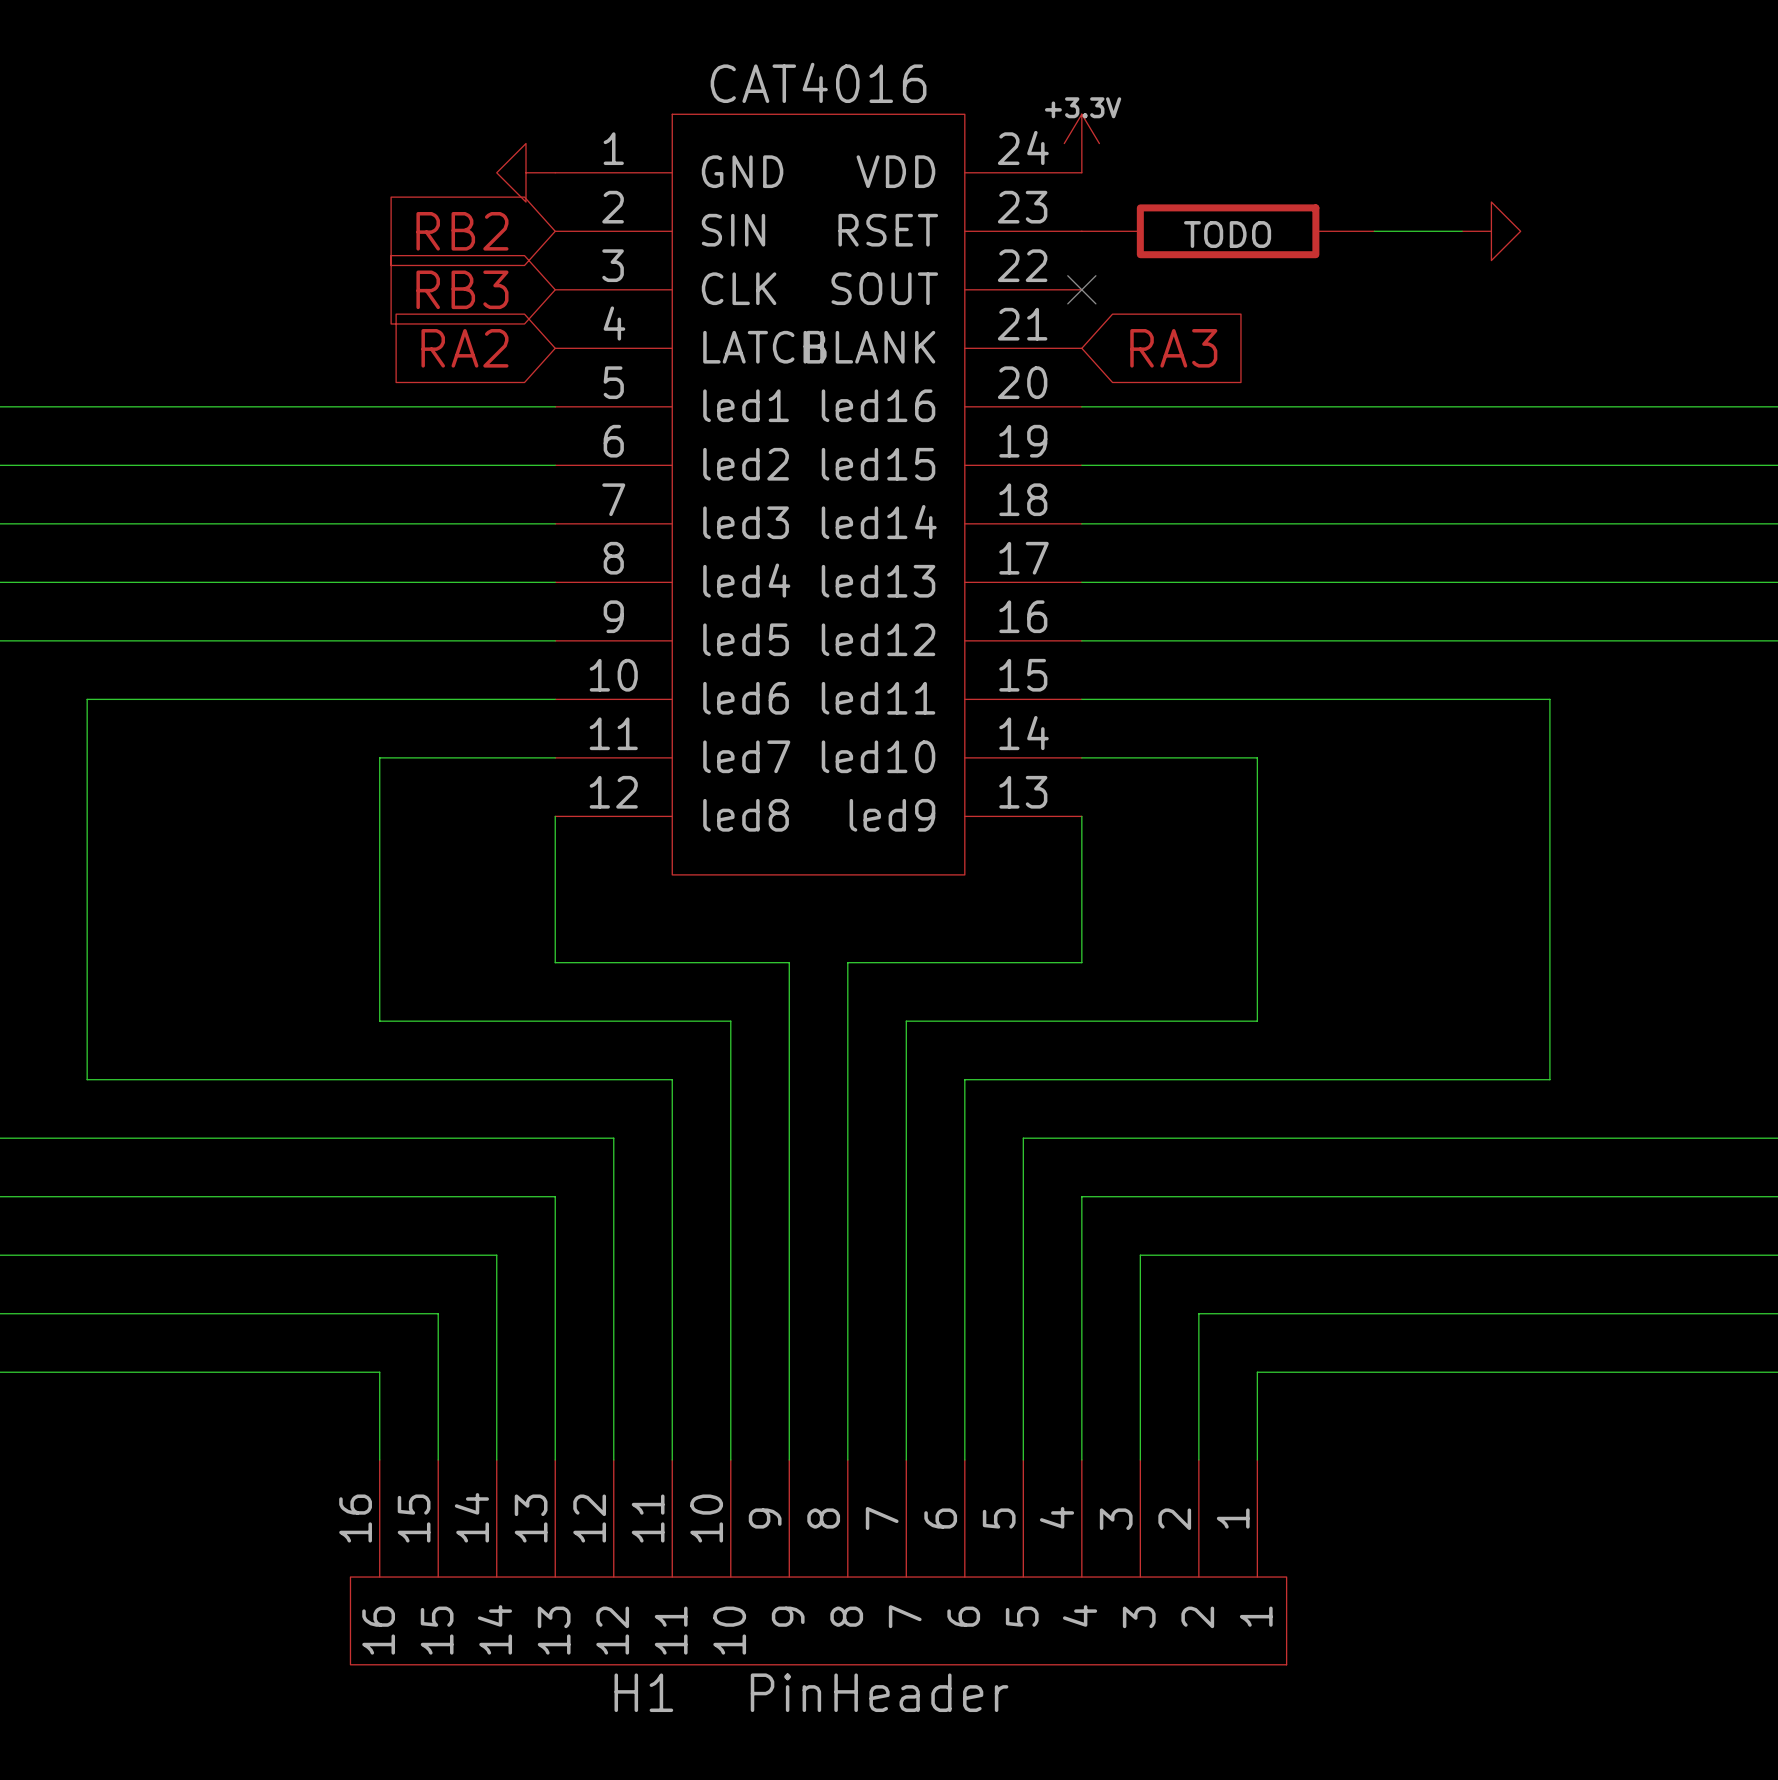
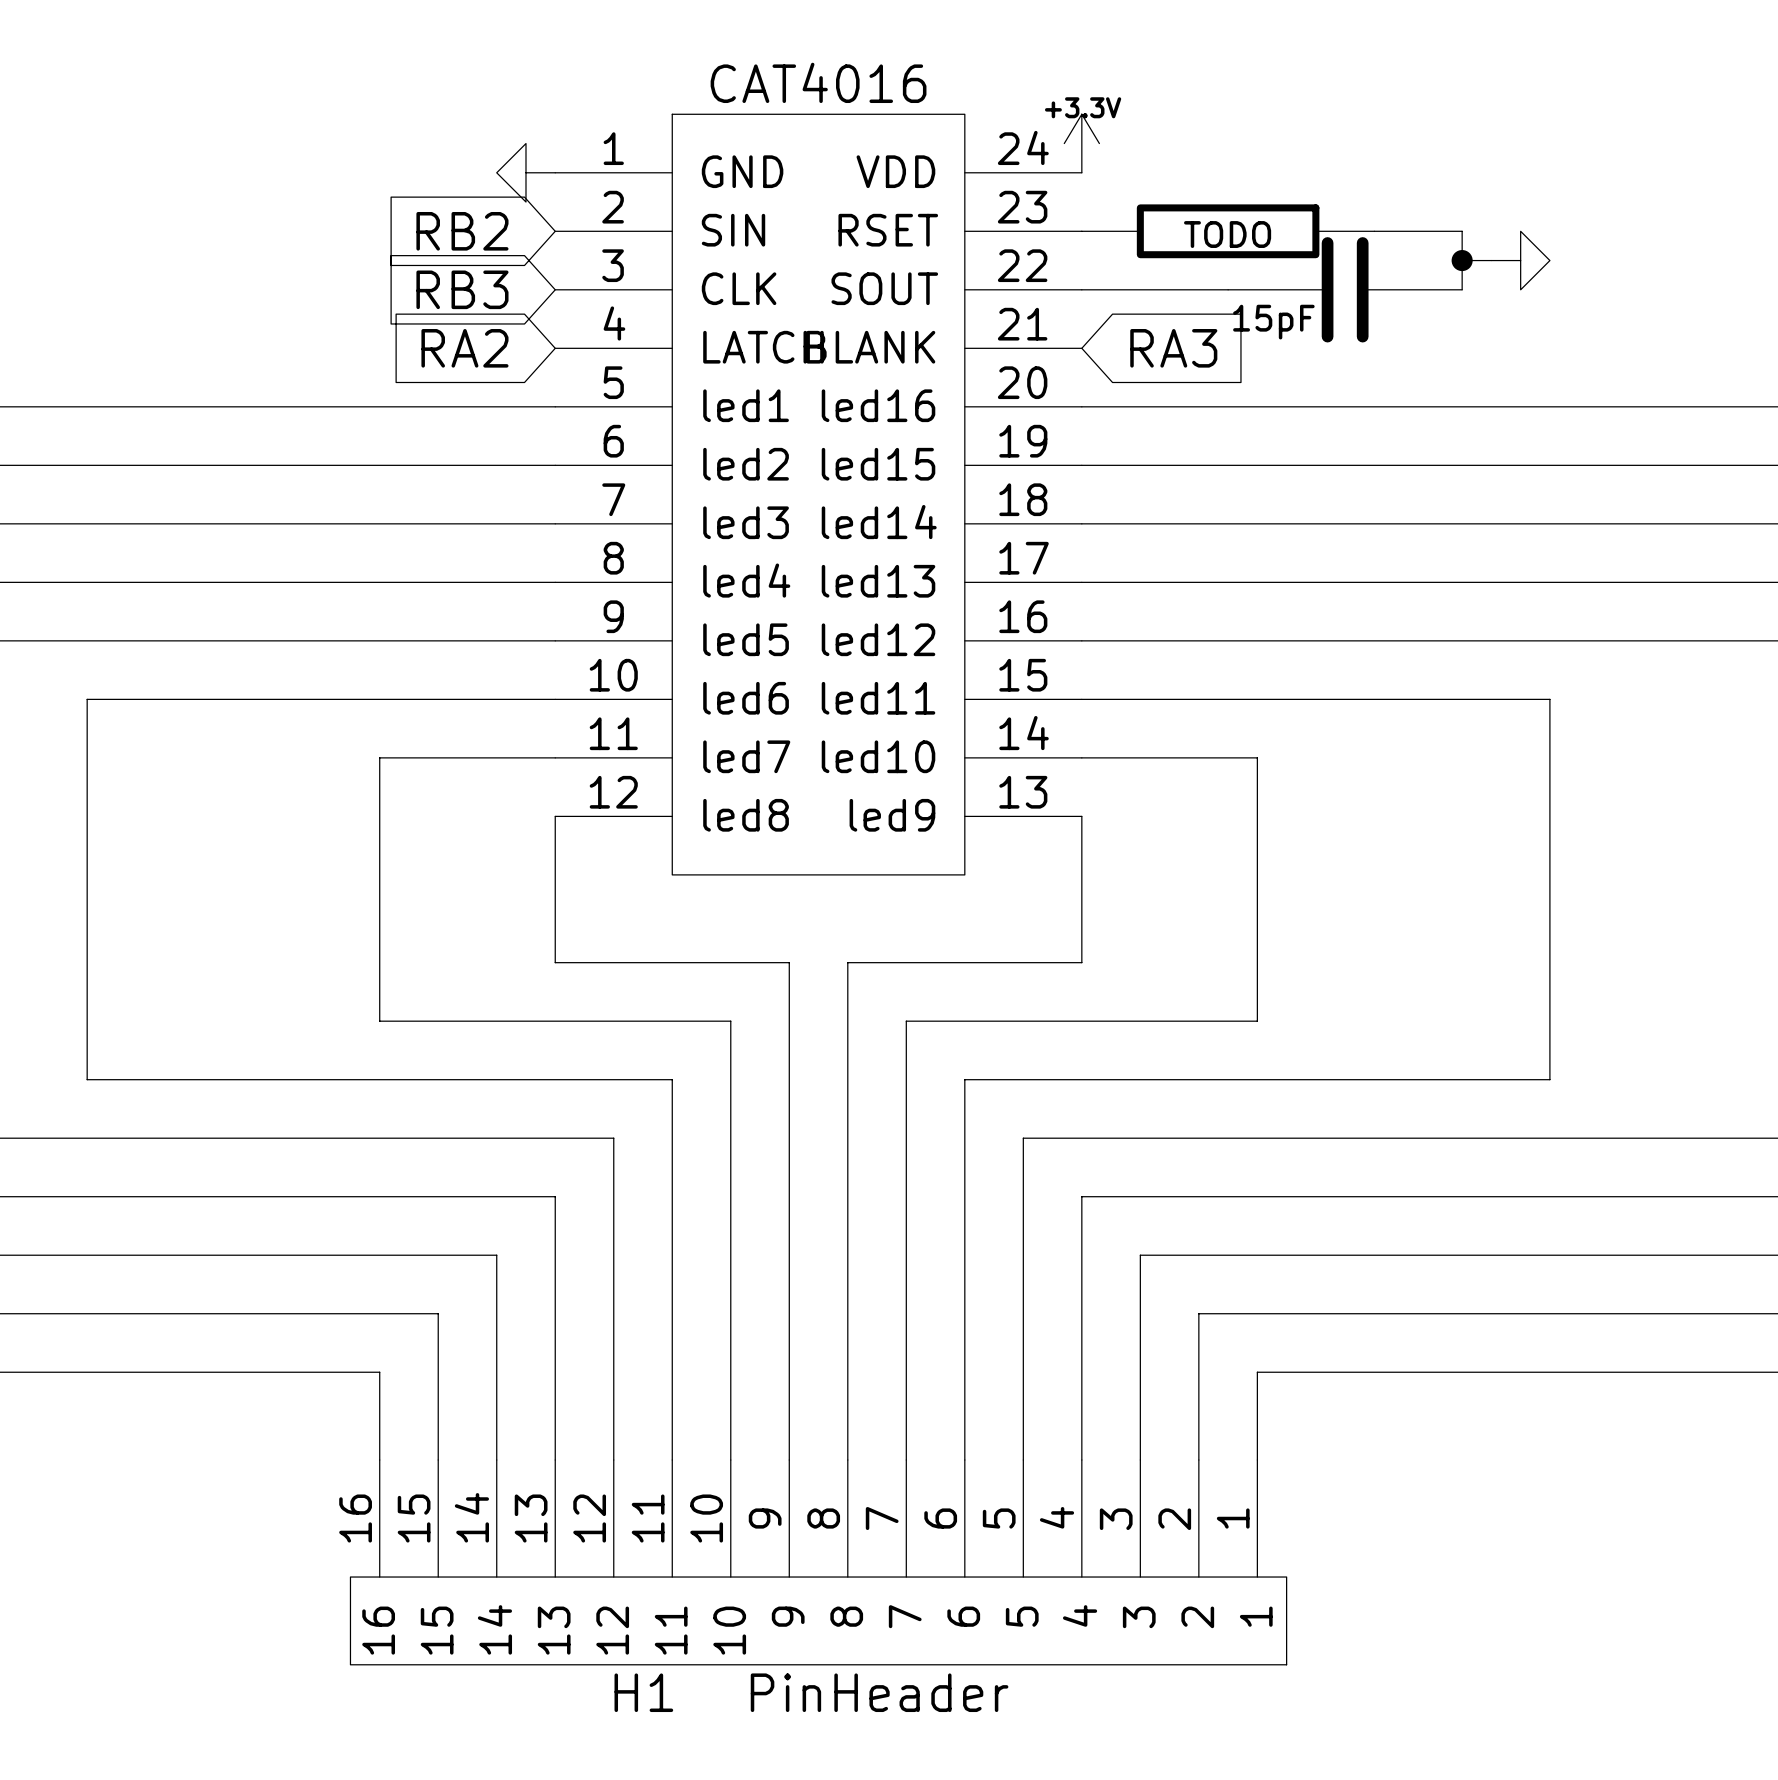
wire: none -> (1462, 231) (1462, 289)
power symbol position: (1491, 231) -> (1520, 260)
wire: none -> (1462, 260) (1491, 260)
junction: none -> (1462, 260)
wire: none -> (1081, 289) (1228, 289)
no-connect mark: (1081, 289) -> none
part: none -> 15pF (1345, 289)

